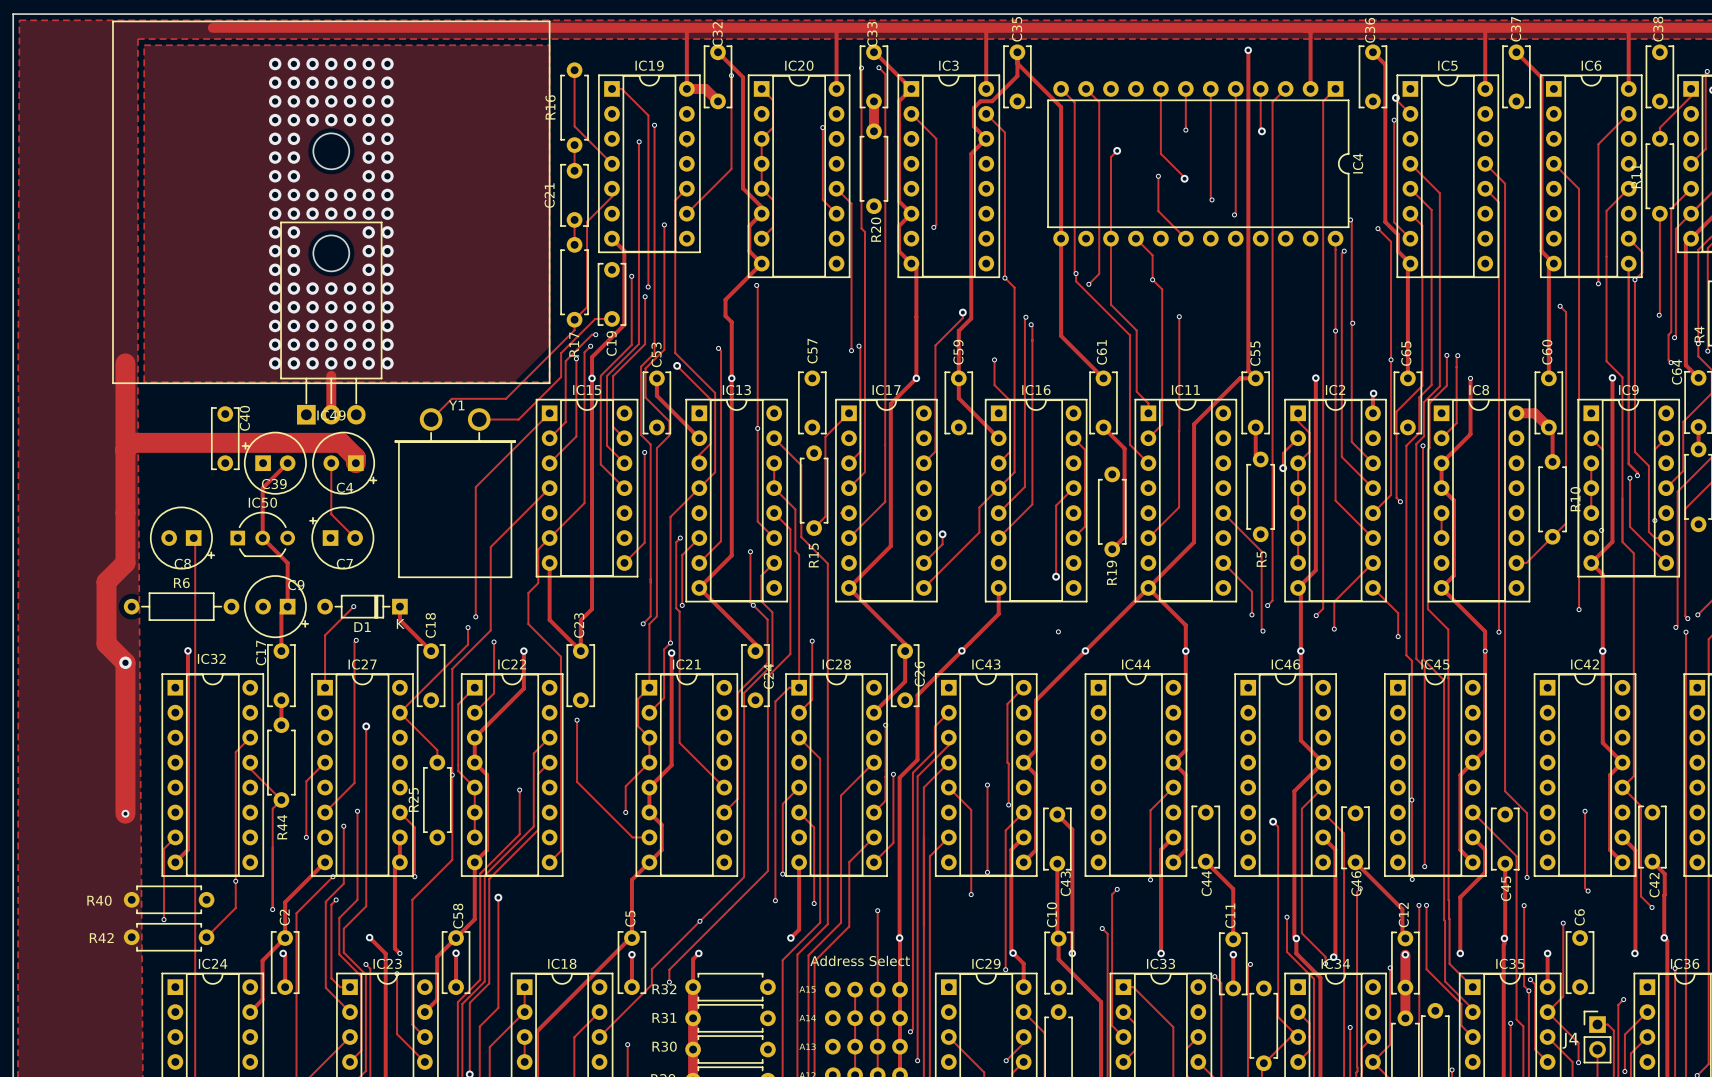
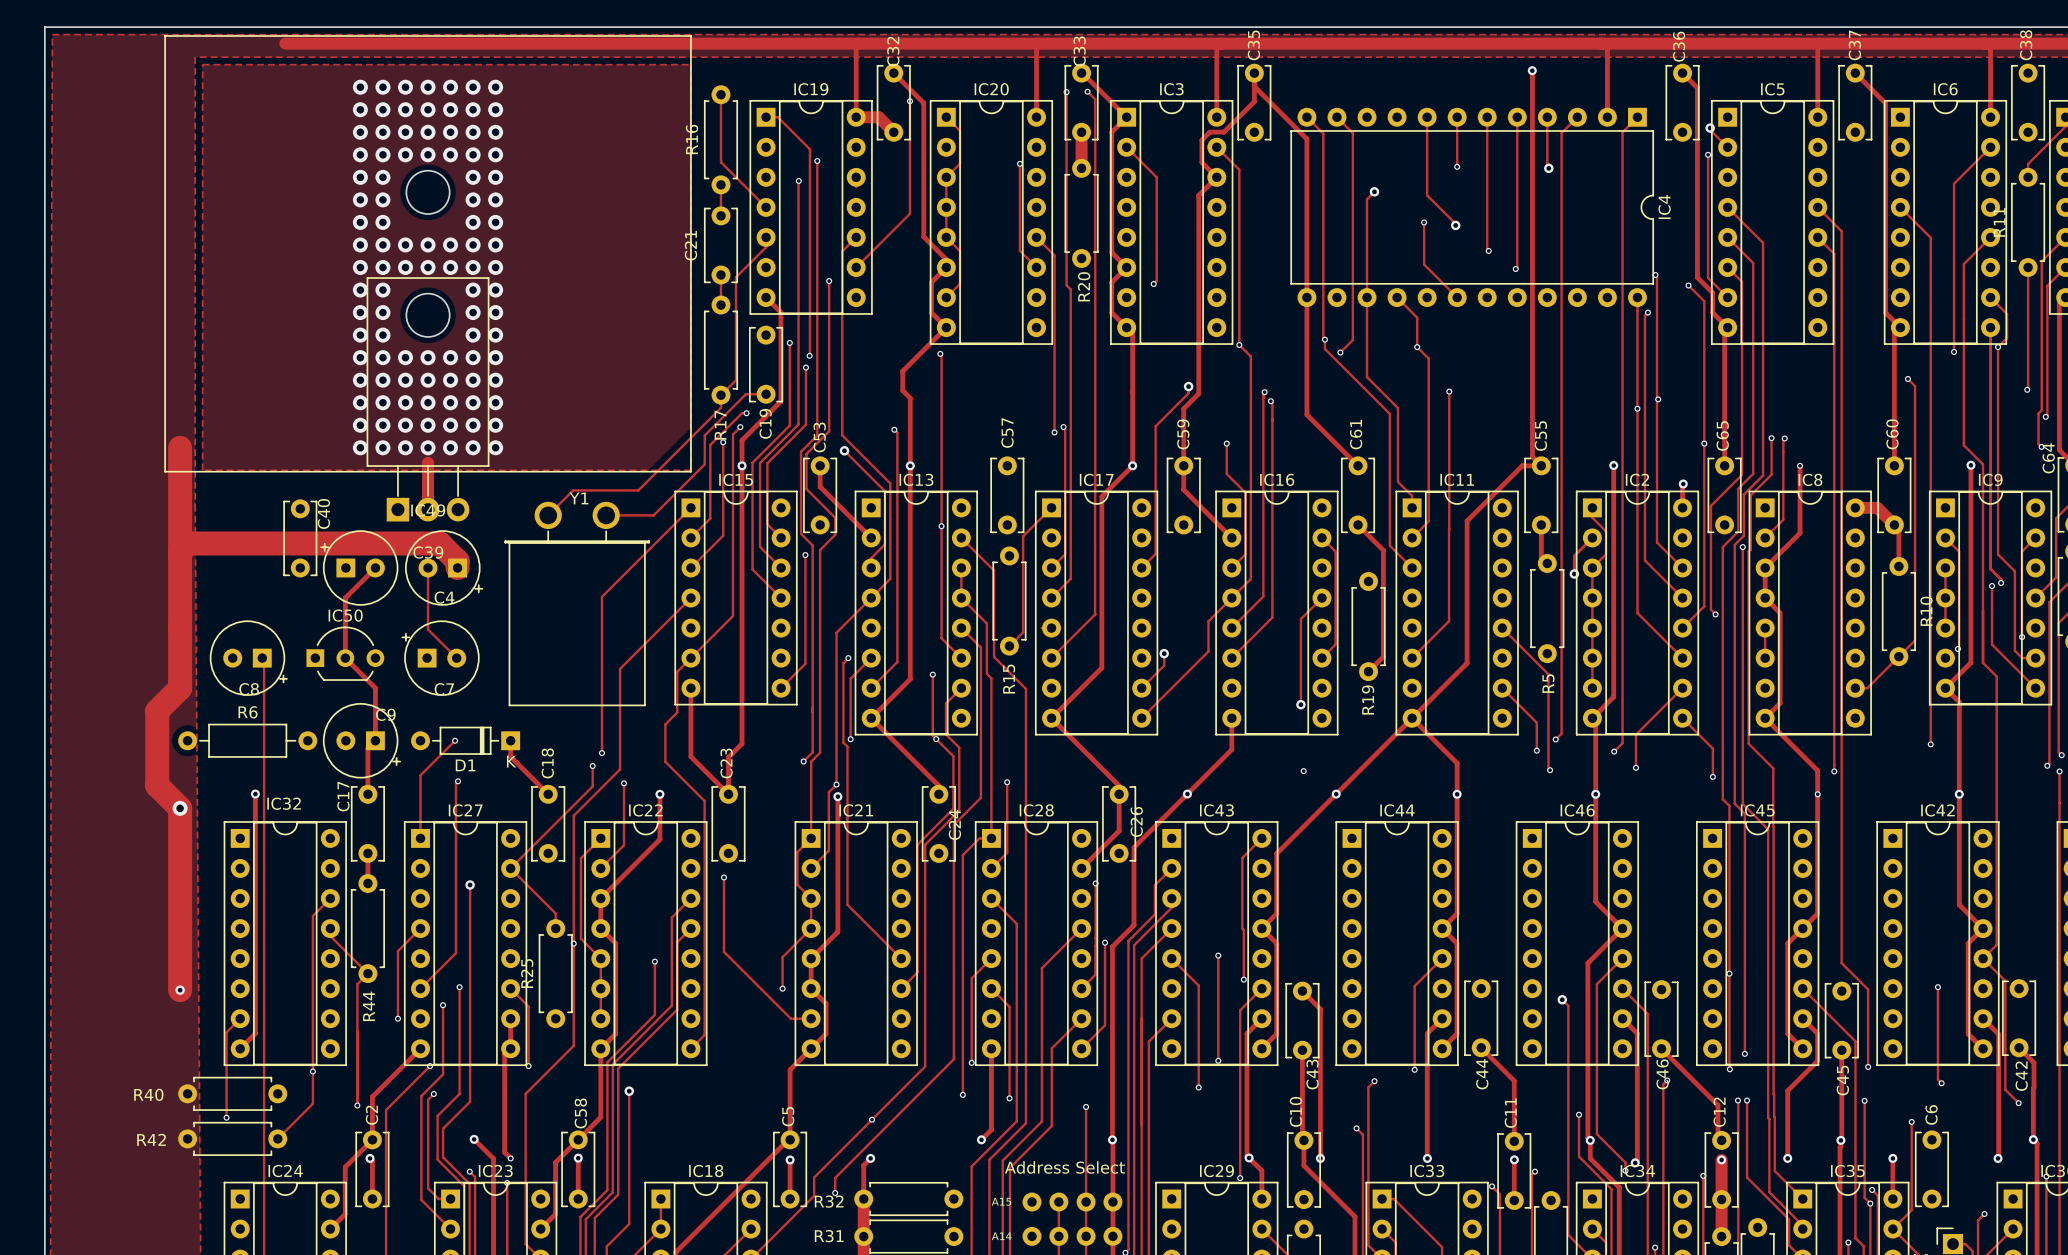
C39 name position: C39 (274, 484) -> C39 (428, 552)

